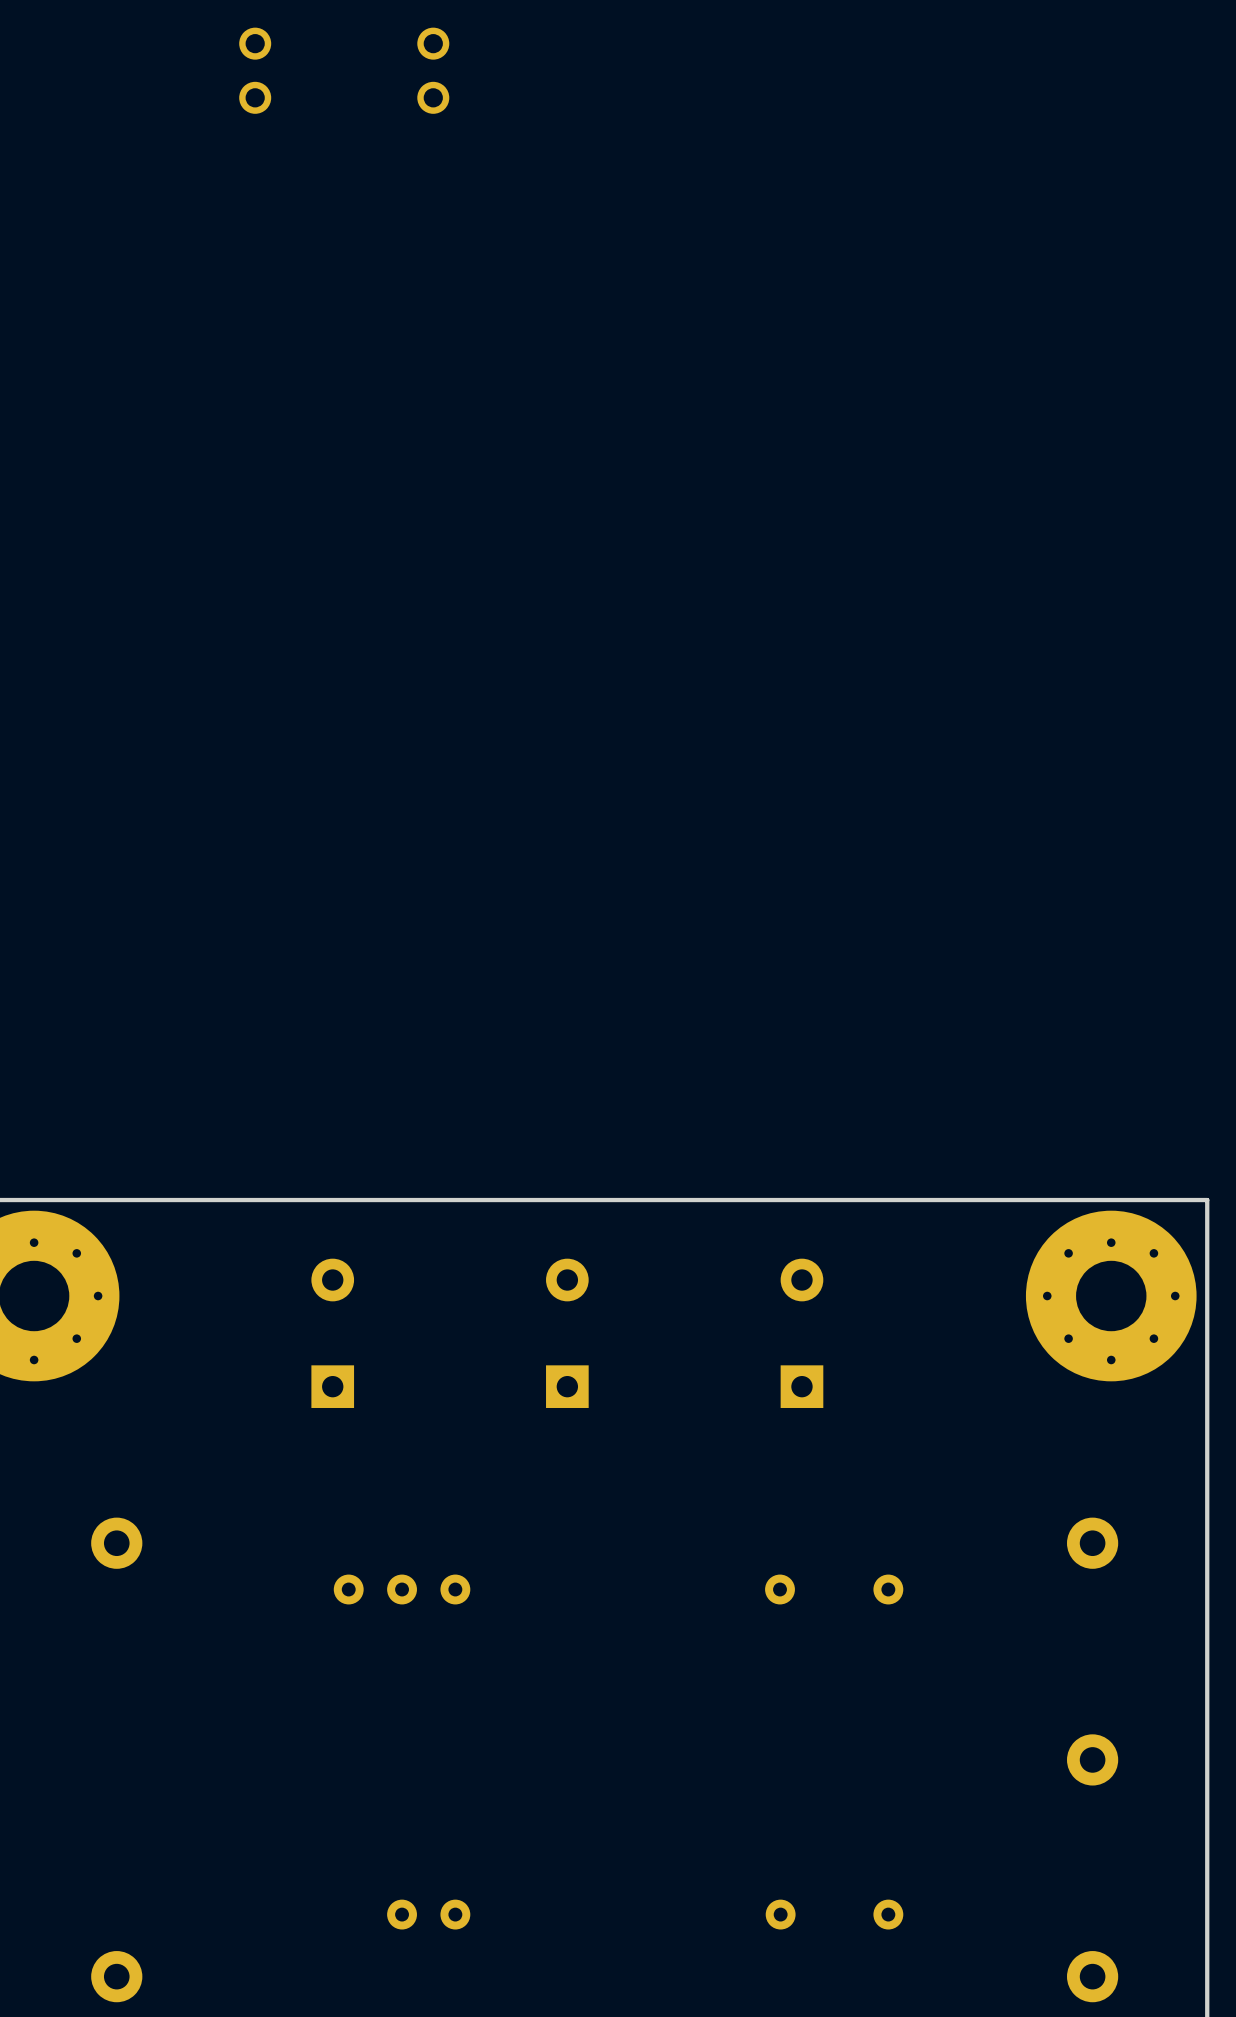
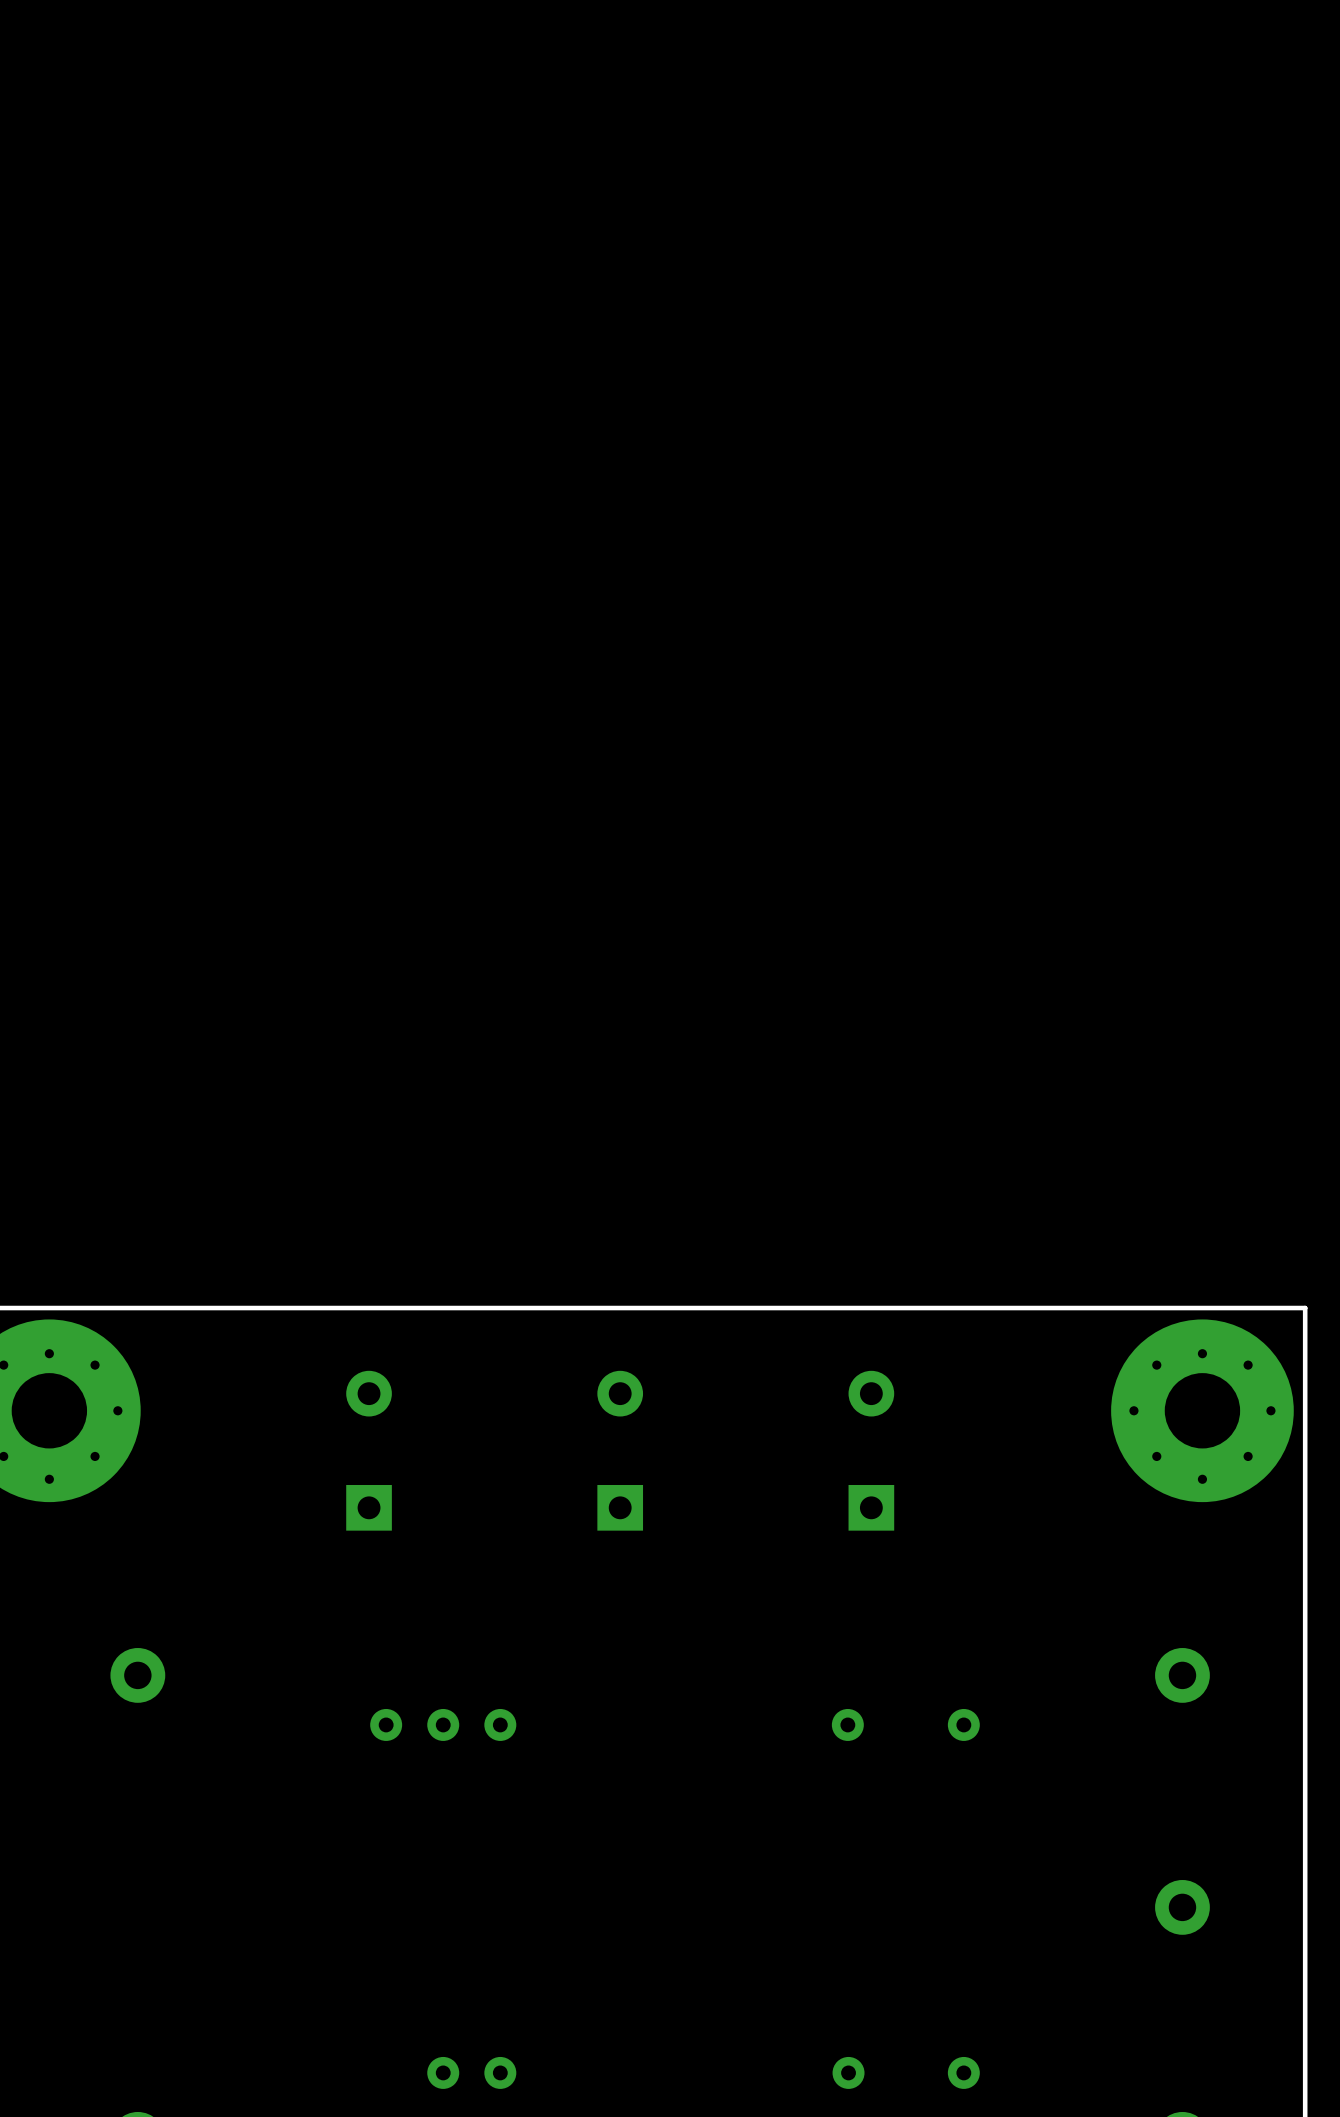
part: (255, 70) -> none
part: (433, 70) -> none

